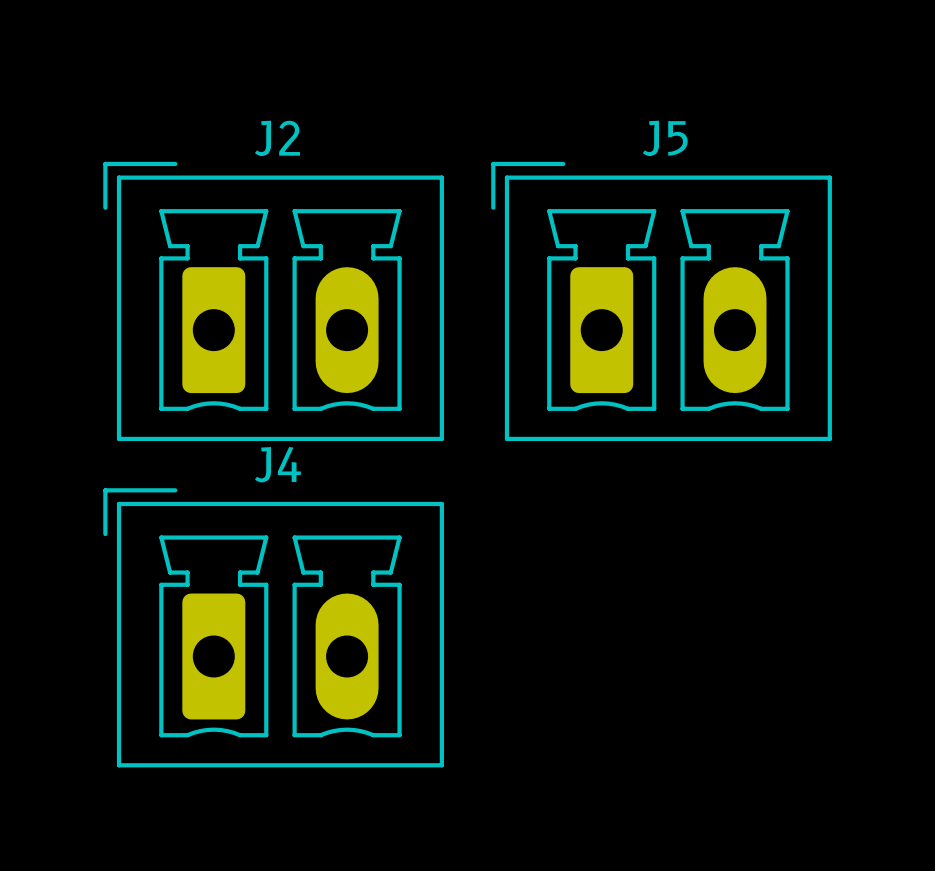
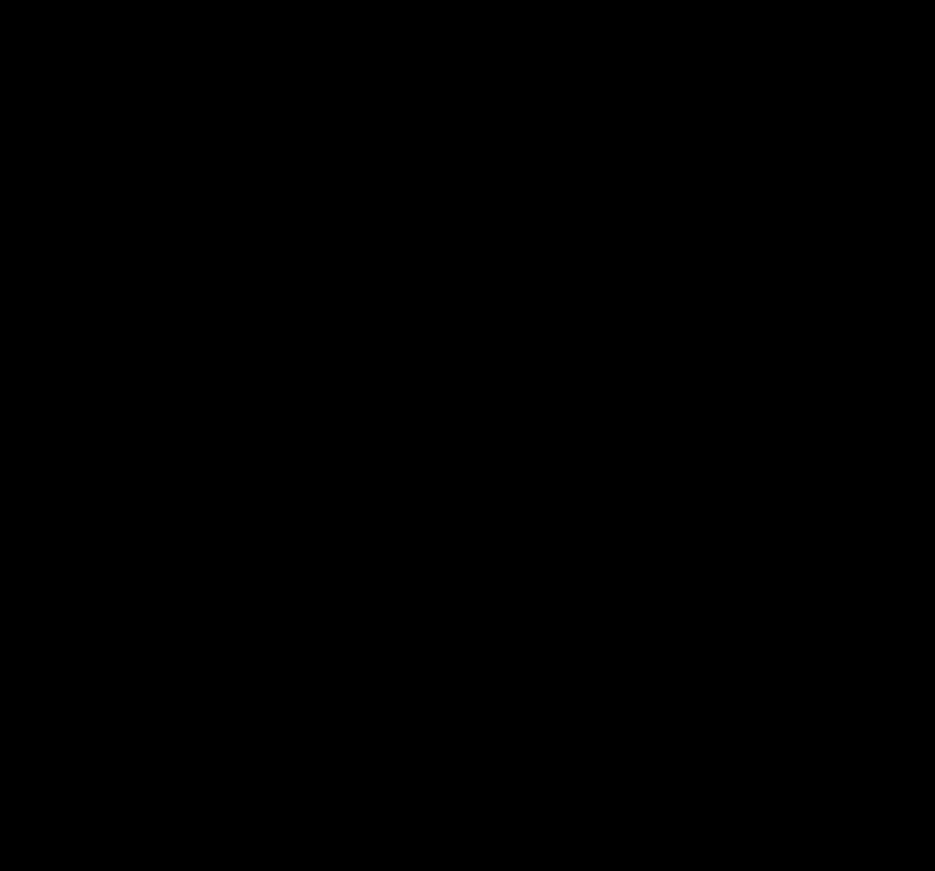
J2: (273, 301) -> none
J5: (661, 301) -> none
J4: (273, 627) -> none

